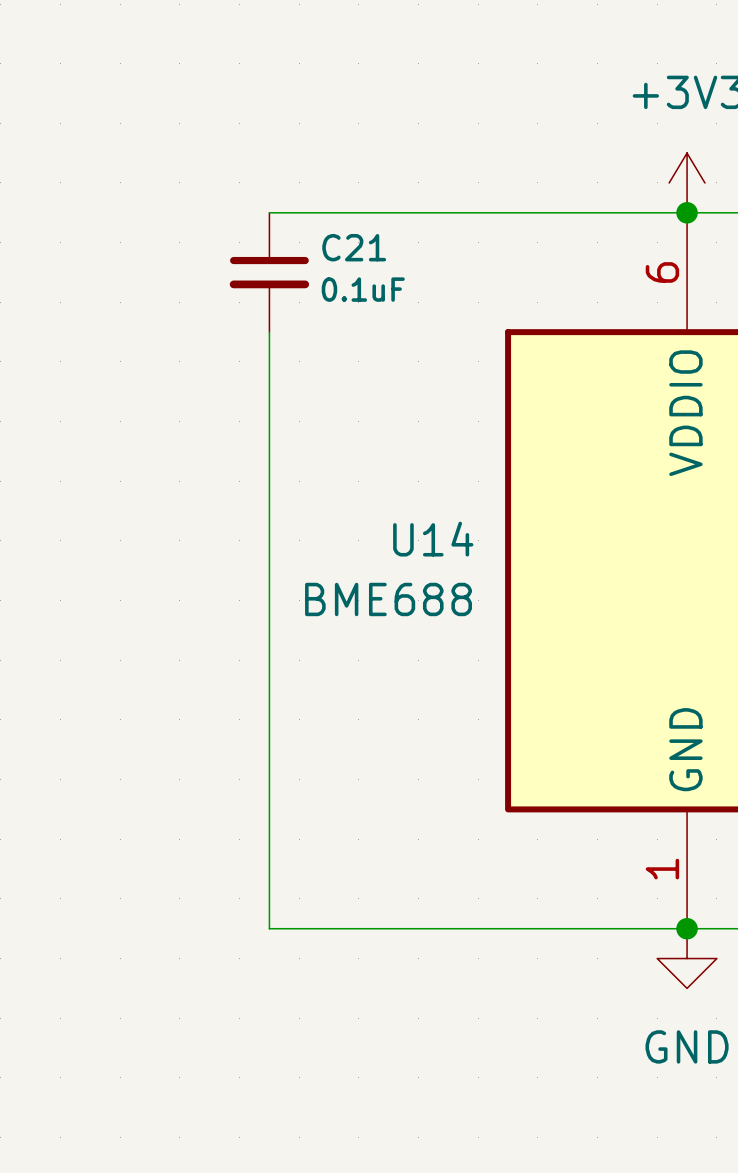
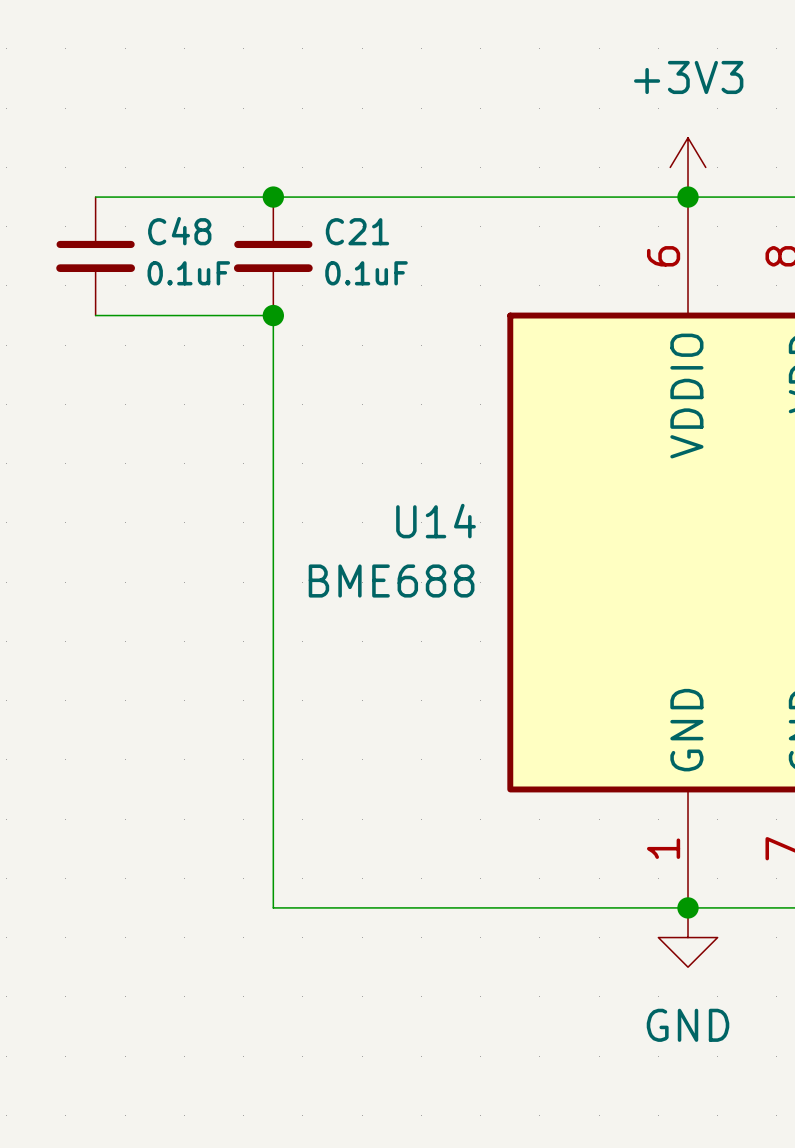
wire: none -> (95, 197) (273, 197)
junction: none -> (273, 197)
C48: none -> 0.1uF (95, 256)
wire: none -> (95, 315) (273, 315)
junction: none -> (273, 315)

